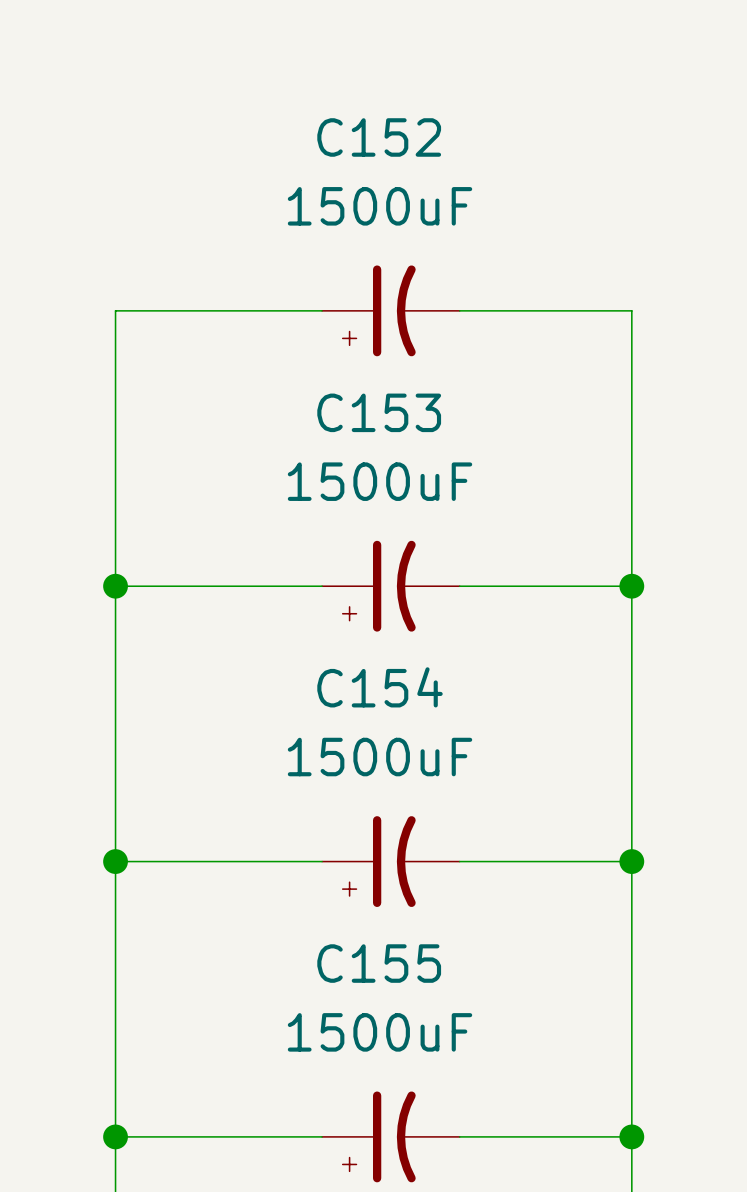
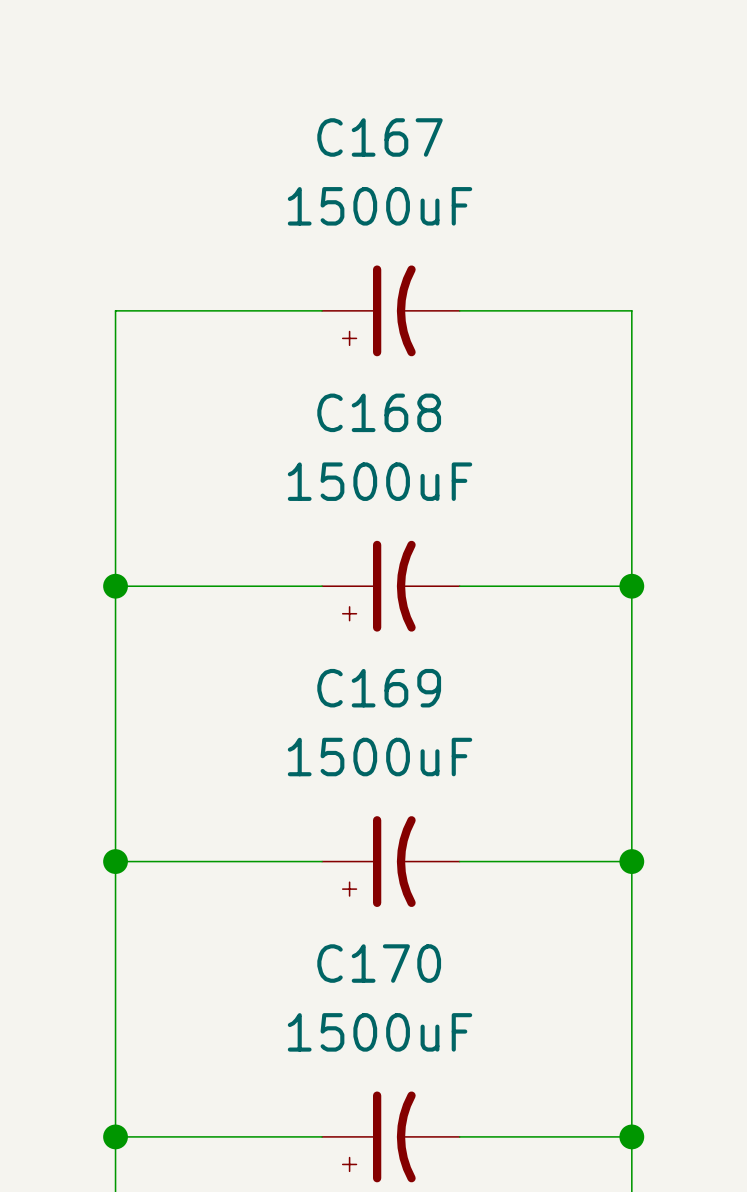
C152 name: C152 (379, 137) -> C167 (380, 137)
C153 name: C153 (379, 412) -> C168 (379, 412)
C154 name: C154 (380, 687) -> C169 (379, 688)
C155 name: C155 (379, 963) -> C170 (379, 963)

